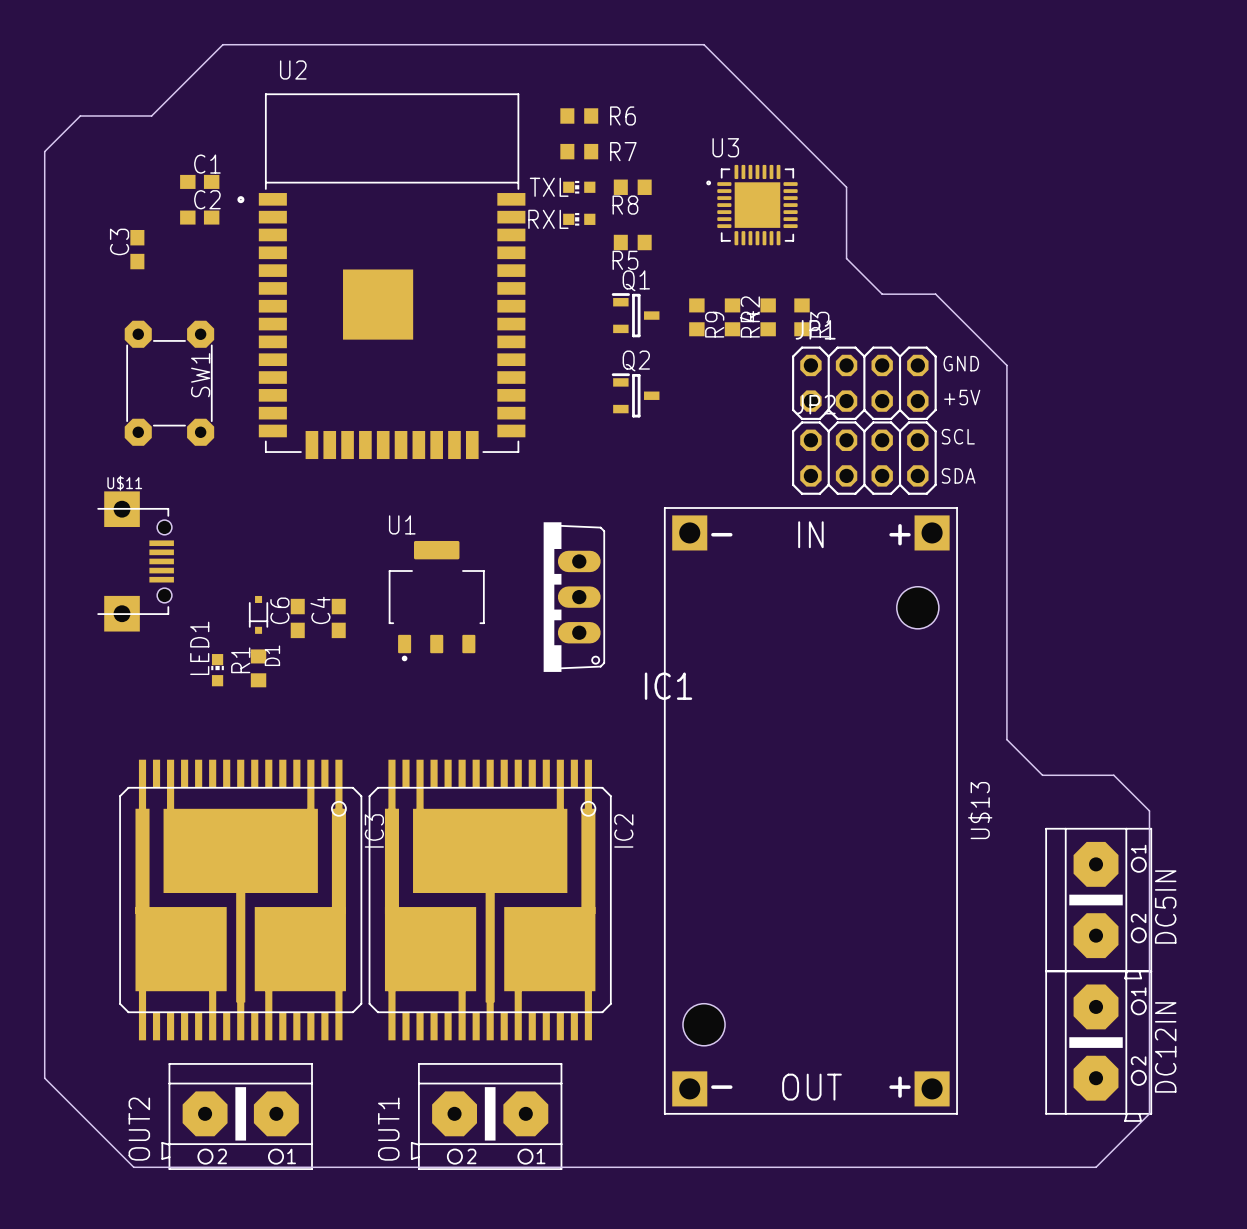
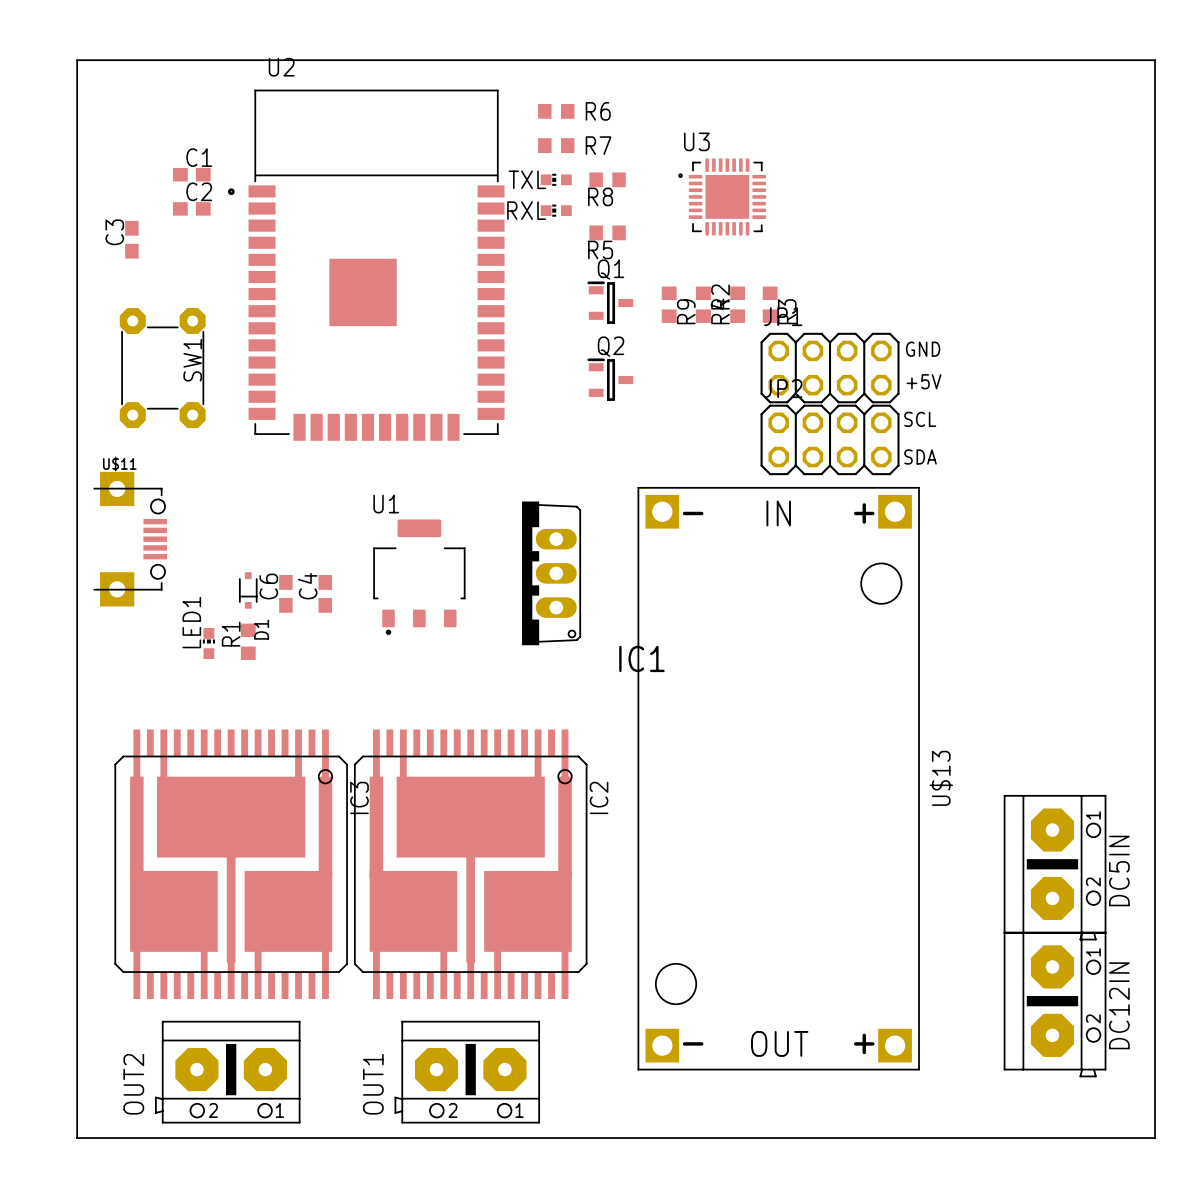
board edge: (222, 44) (704, 44) (846, 187) (846, 258) (882, 294) (935, 294) (1006, 365) (1006, 739) (1042, 775) (1113, 775) (1149, 810) (1149, 1113) (1096, 1167) (133, 1167) (44, 1078) (44, 151) (80, 115) (151, 115) (222, 44) -> (77, 60) (77, 1138) (1155, 1138) (1155, 60) (77, 60)

